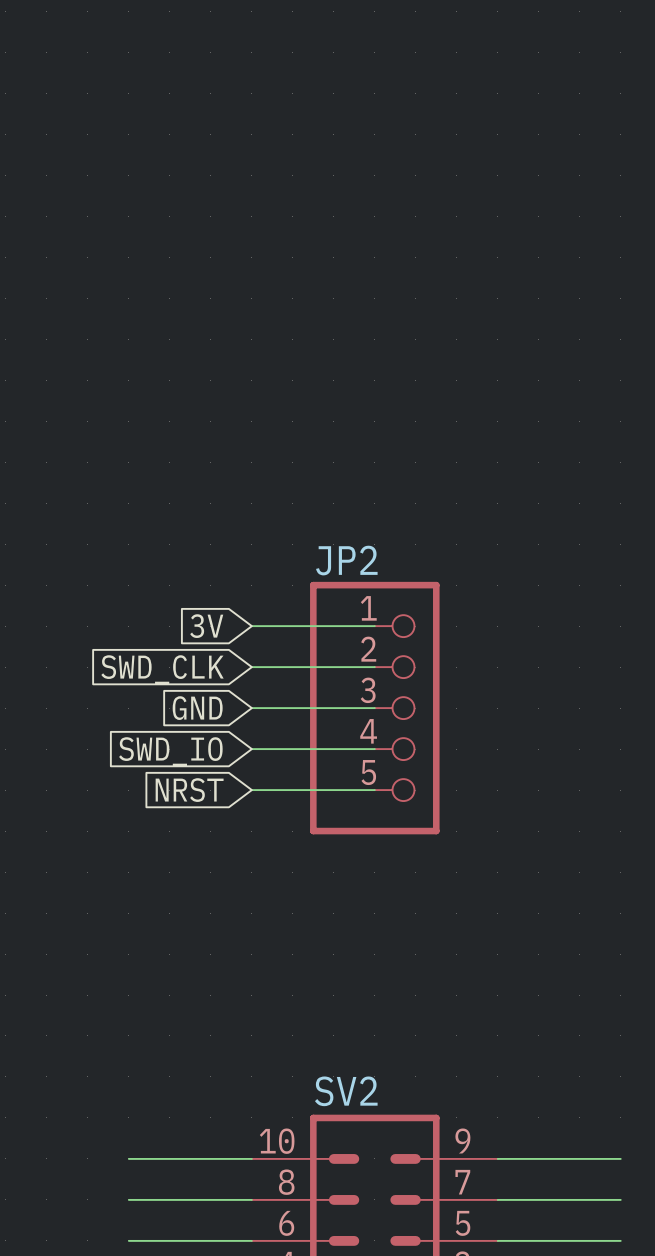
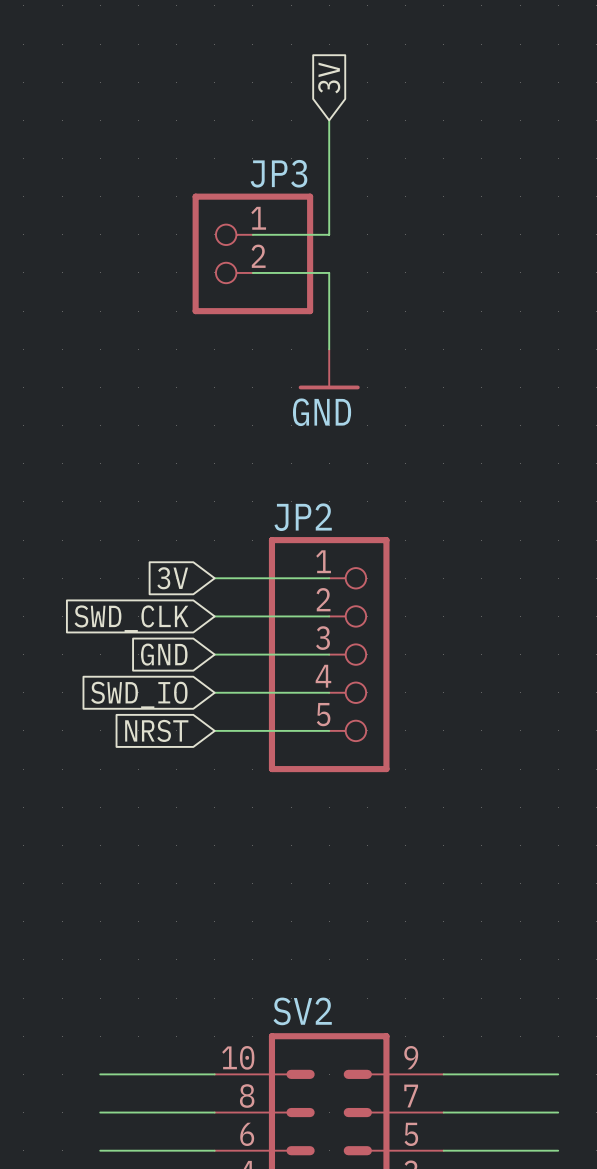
global label: none -> 3V (329, 77)
wire: none -> (329, 120) (329, 234) (252, 234)
JP3: none -> (252, 253)
wire: none -> (252, 272) (329, 272) (329, 349)
power symbol: none -> GND (329, 369)

